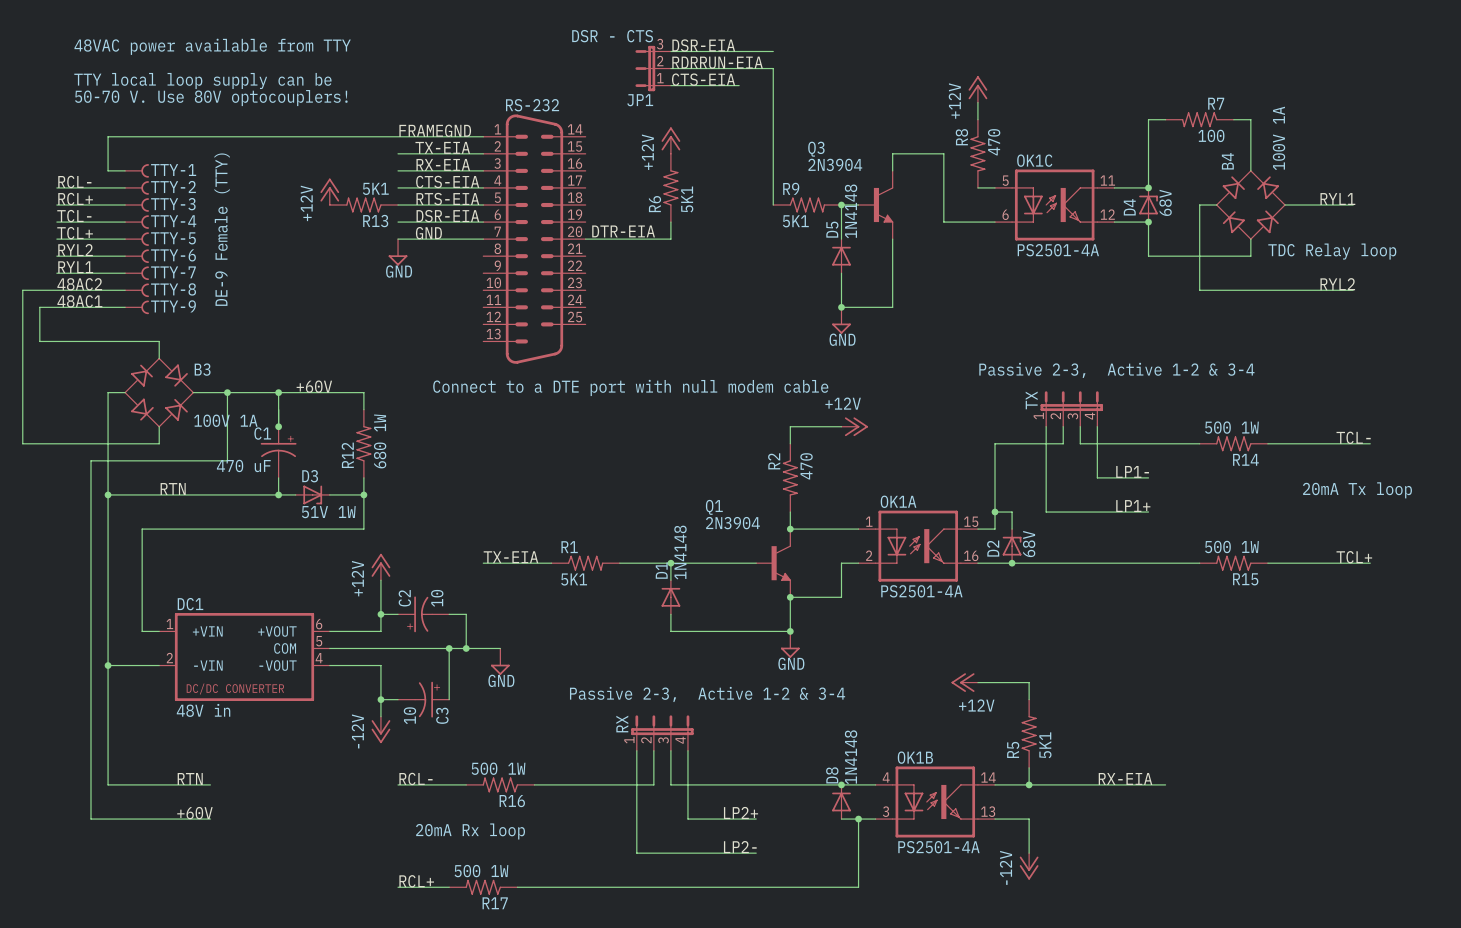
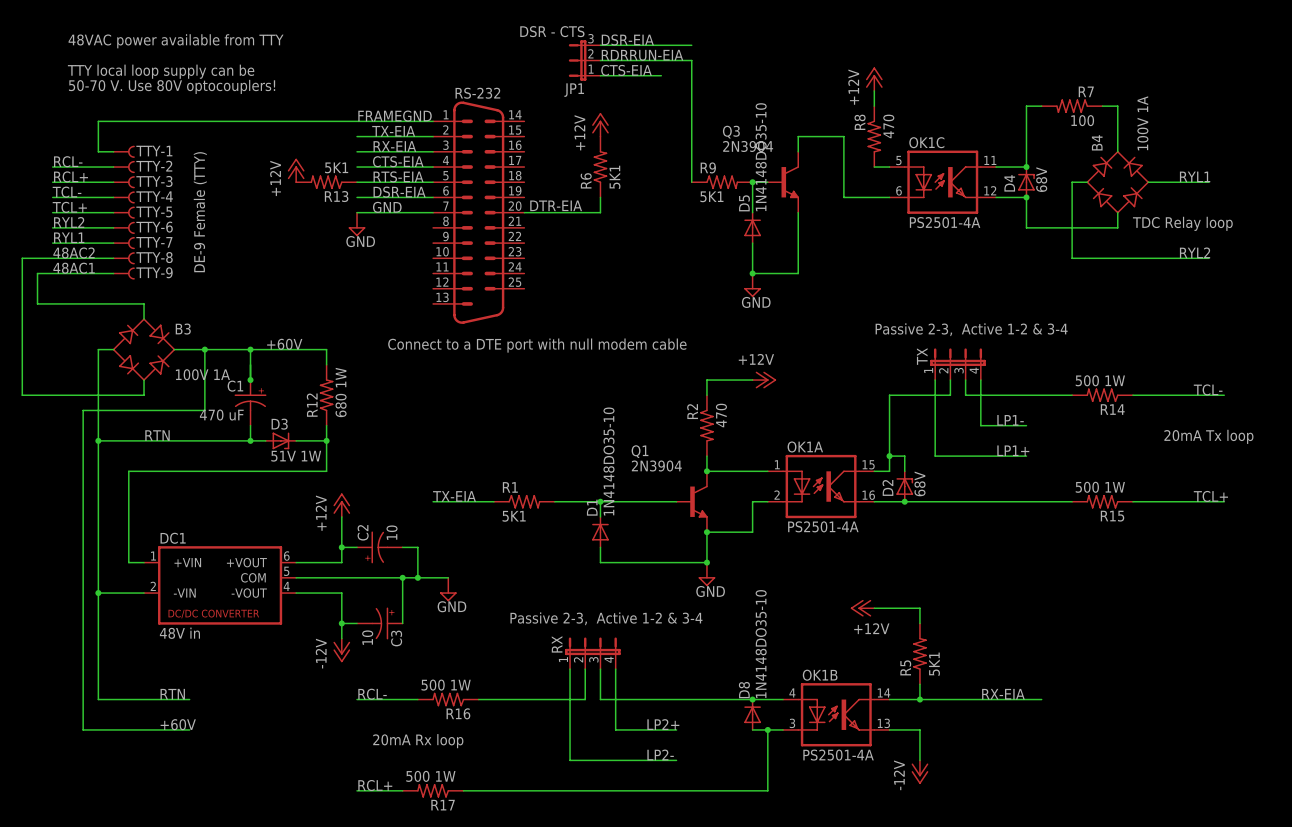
D5 value: 1N4148 (851, 211) -> 1N4148DO35-10 (761, 157)
D1 value: 1N4148 (680, 552) -> 1N4148DO35-10 (608, 461)
D8 value: 1N4148 (851, 757) -> 1N4148DO35-10 (761, 644)

